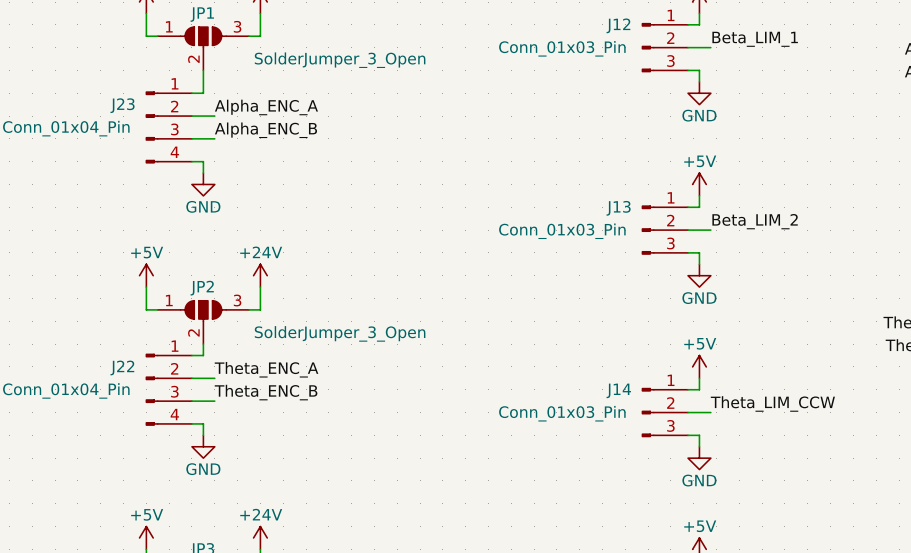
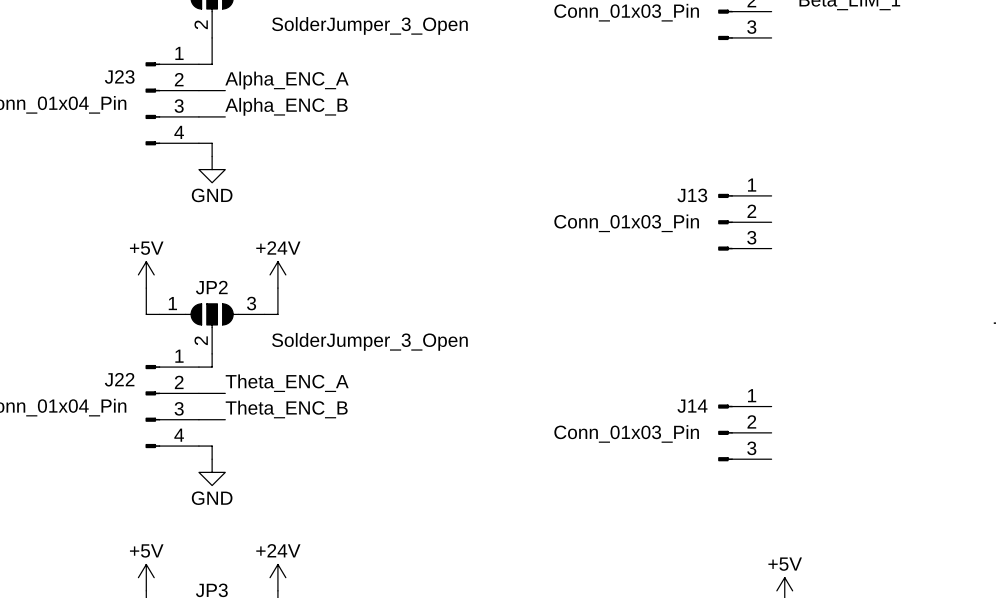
wire: (688, 47) (710, 47) -> none
wire: (688, 70) (699, 70) (699, 81) -> none
power symbol: GND (699, 93) -> none
power symbol: +5V (699, 184) -> none
wire: (699, 195) (699, 207) (688, 207) -> none
label: Beta_LIM_2 (755, 221) -> none
wire: (688, 230) (710, 230) -> none
wire: (688, 252) (699, 252) (699, 264) -> none
power symbol: GND (699, 275) -> none
power symbol: +5V (699, 366) -> none
wire: (699, 378) (699, 389) (688, 389) -> none
label: Theta_LIM_CCW (772, 403) -> none
wire: (688, 412) (710, 412) -> none
wire: (688, 435) (699, 435) (699, 446) -> none
power symbol: GND (699, 458) -> none

